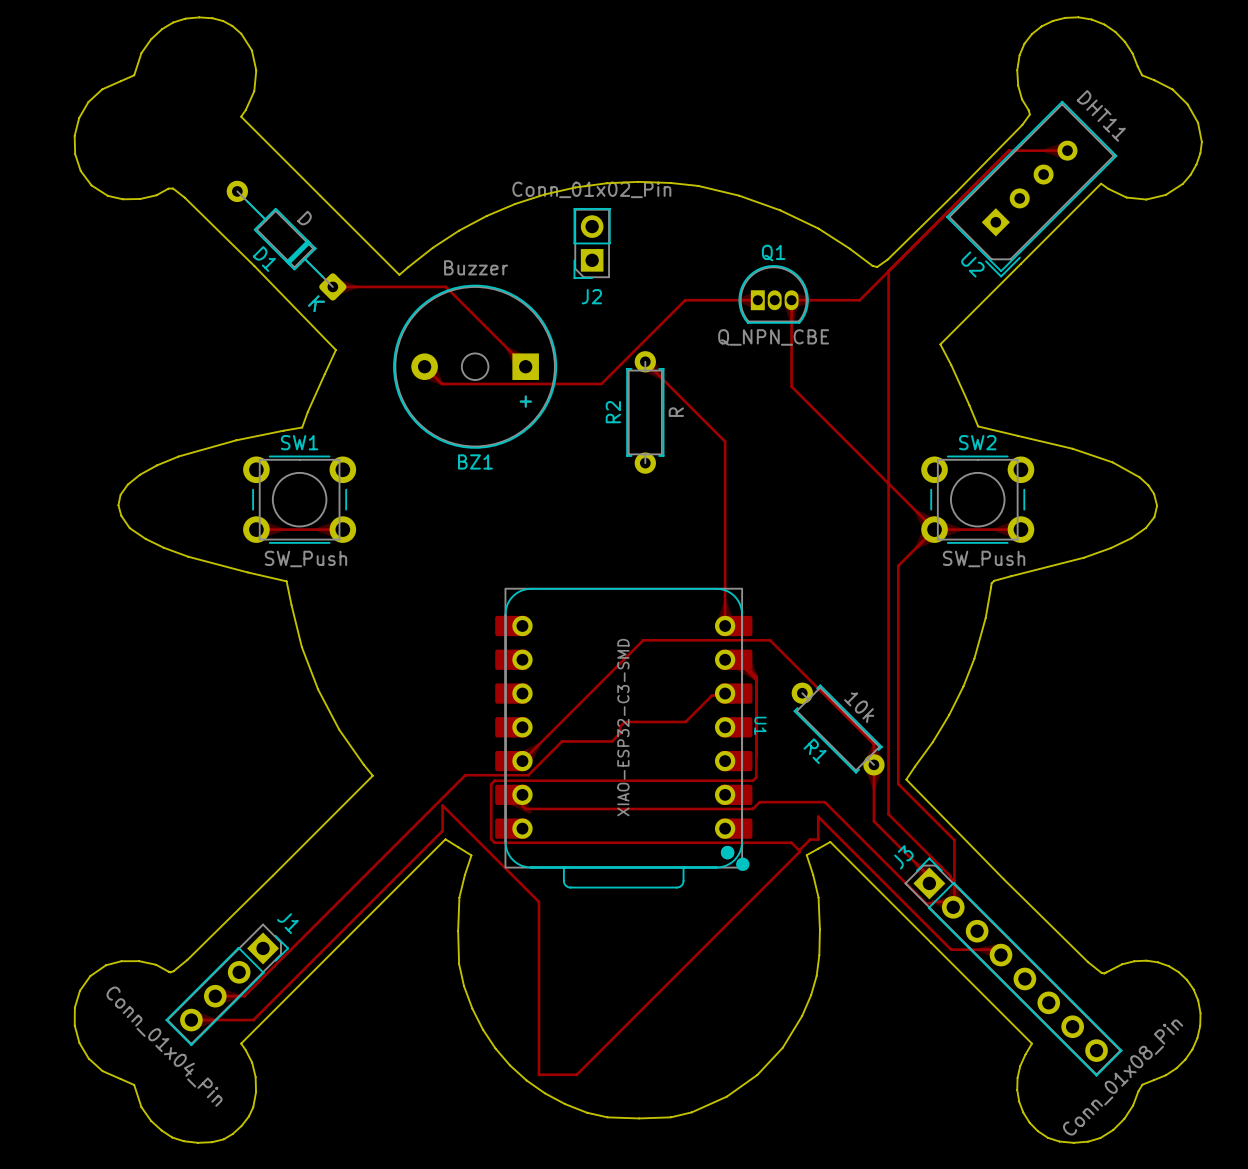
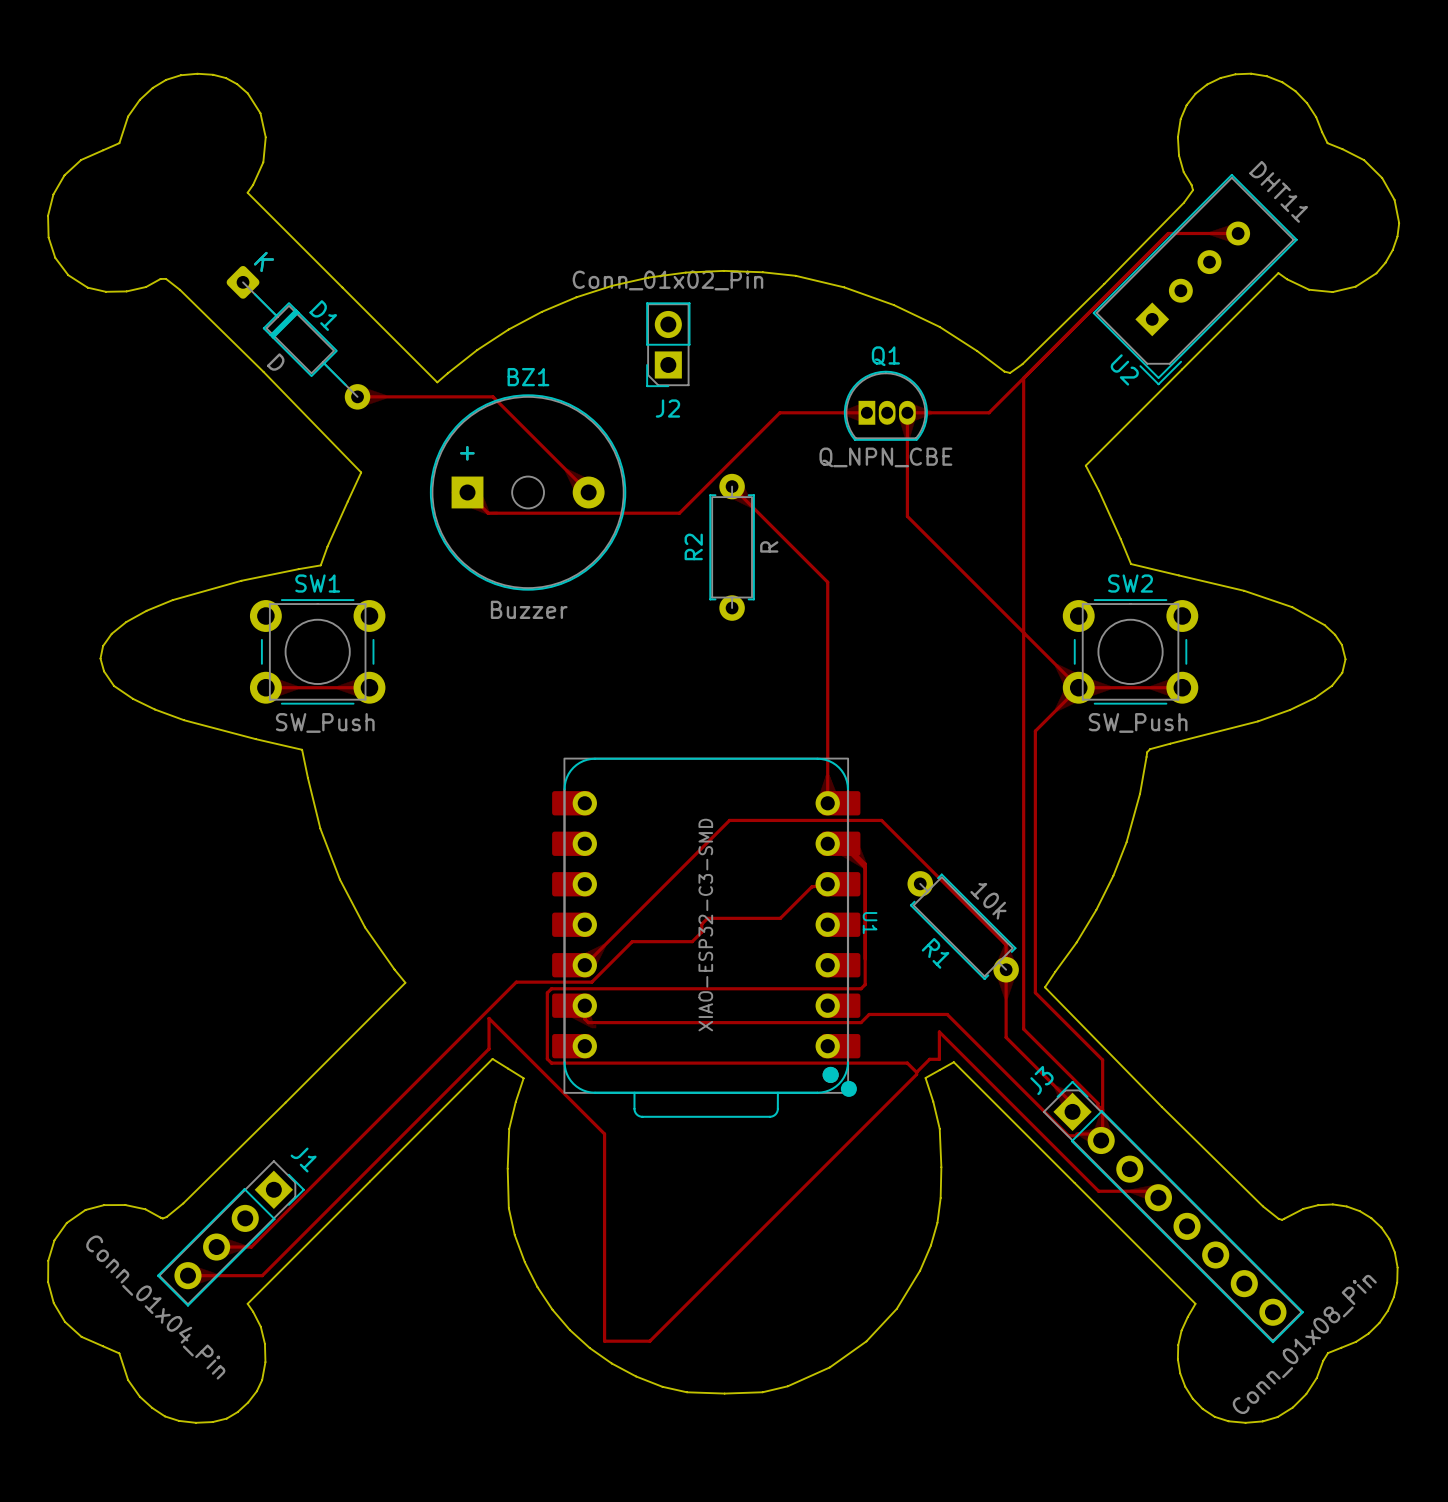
D1 rotation: 0° (286, 240) -> 180° (298, 337)
BZ1 rotation: 0° (475, 366) -> 180° (528, 492)

